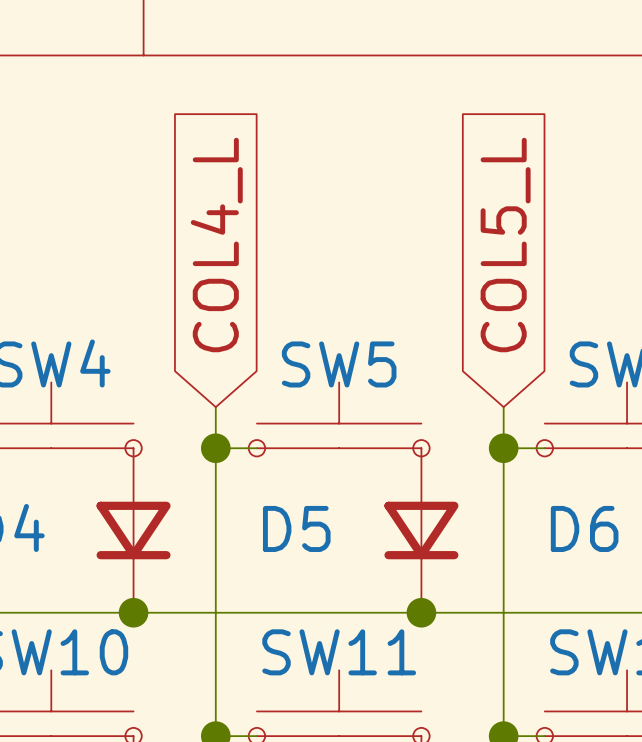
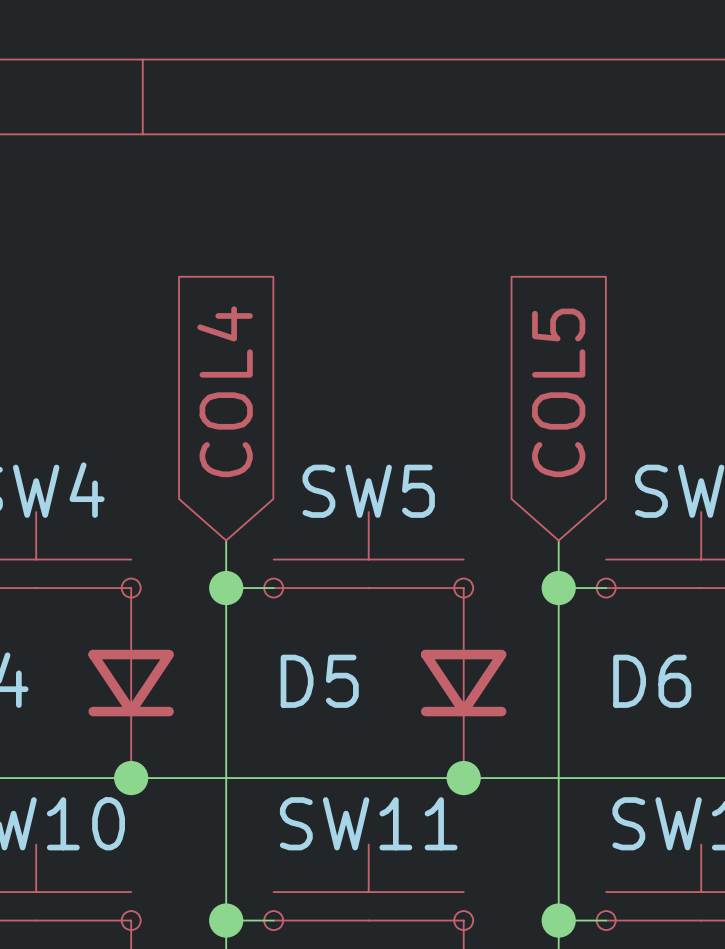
global label: COL4_L (216, 245) -> COL4 (225, 391)
global label: COL5_L (505, 245) -> COL5 (558, 392)

